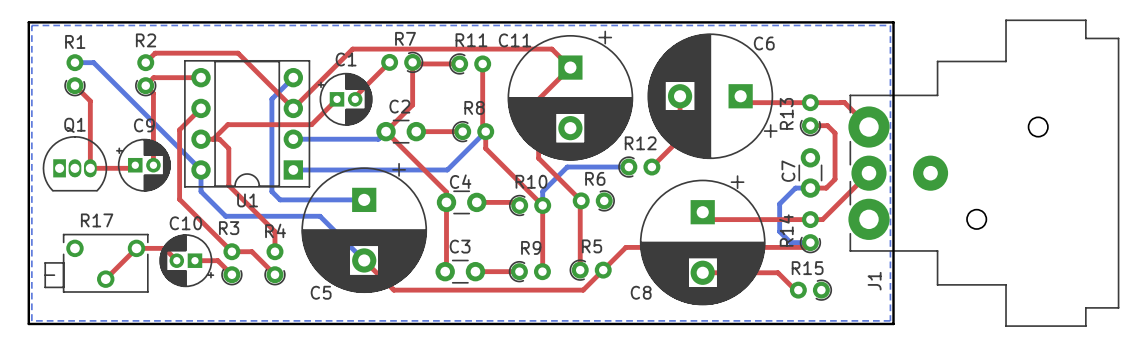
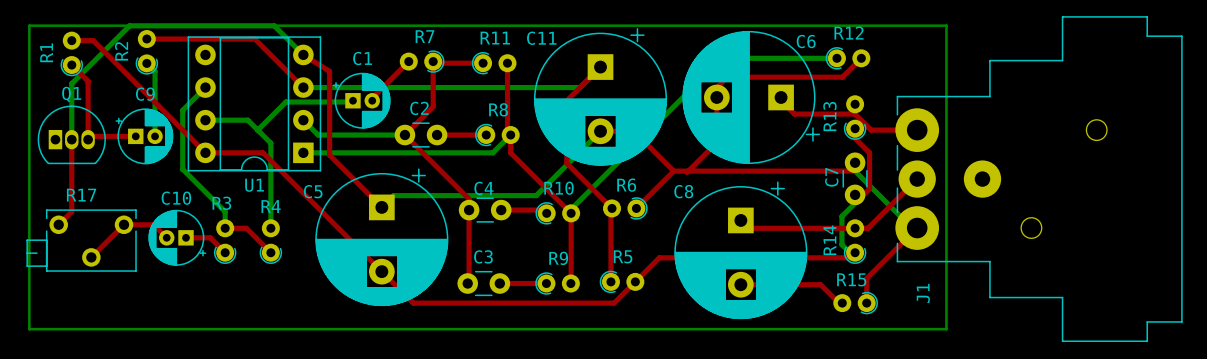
board edge: (28, 22) (893, 22) (893, 323) (28, 323) (28, 22) -> none
bottom zone outline: (31, 25) (31, 320) (890, 320) (890, 25) (31, 25) -> none
bottom track: none -> (29, 25) (946, 25) (946, 329) (29, 329) (29, 25)
R2 name rotation: 0° (146, 40) -> 90° counterclockwise (121, 51)
R1 name rotation: 0° (75, 41) -> 90° counterclockwise (46, 52)
top track: none -> (146, 39) (254, 38) (303, 87)
top track: none -> (71, 41) (93, 40) (205, 152) (263, 152) (381, 271)
top track: none -> (303, 54) (329, 71) (329, 155) (381, 207)
bottom track: none -> (303, 54) (274, 25) (129, 25) (71, 83) (71, 139)
top track: none -> (861, 58) (842, 77) (727, 77) (710, 94)
bottom track: (74, 62) (93, 62) (201, 169) (201, 191) (225, 216) (320, 216) (364, 260) -> none
top track: (145, 62) (155, 53) (238, 53) (293, 108) (352, 49) (551, 49) (570, 67) -> none
bottom track: none -> (146, 63) (155, 71) (155, 136)
top track: none -> (71, 65) (88, 81) (88, 139) (91, 136) (135, 136)
bottom track: none -> (600, 67) (580, 87) (303, 87)
R1 position: (74, 75) -> (71, 53)
R2 position: (145, 75) -> (146, 52)
top track: (201, 77) (153, 77) (145, 85) (153, 93) (153, 165) -> none
bottom track: (293, 77) (271, 99) (271, 191) (280, 199) (364, 199) -> none
top track: (74, 85) (90, 101) (90, 168) (132, 168) (135, 165) -> none
bottom track: none -> (205, 87) (182, 110) (182, 169) (225, 211) (225, 228)
top track: (740, 96) (747, 102) (844, 102) (868, 127) -> (774, 94) (794, 114) (855, 114) (871, 130) (917, 130)
top track: (337, 99) (311, 124) (227, 124) (213, 139) -> none
bottom track: none -> (352, 100) (285, 102) (257, 130)
top track: (201, 108) (179, 129) (179, 199) (231, 251) (251, 251) (274, 274) -> none
bottom track: none -> (205, 120) (247, 120) (270, 143) (270, 228)
U1 position: (247, 123) -> (254, 103)
top track: (810, 125) (827, 125) (835, 133) (835, 179) (826, 188) (810, 188) -> none
top track: none -> (600, 131) (633, 131) (673, 171)
bottom track: none -> (600, 131) (536, 195) (393, 195) (384, 204)
bottom track: (386, 131) (378, 139) (293, 139) -> (404, 135) (318, 135) (303, 120)
top track: none -> (855, 138) (869, 152) (869, 188) (855, 203)
top track: none -> (71, 139) (71, 211) (58, 224)
top track: (201, 139) (219, 139) (228, 148) (228, 185) (274, 231) (274, 251) -> none
bottom track: (468, 148) (447, 169) (293, 169) -> (492, 152) (303, 152)
Q1 position: (74, 163) -> (71, 134)
C9 position: (143, 165) -> (144, 136)
top track: none -> (673, 171) (636, 208)
top track: none -> (673, 171) (855, 171)
bottom track: none -> (855, 171) (912, 228) (917, 228)
bottom track: (628, 167) (567, 167) (542, 191) (542, 201) -> (836, 58) (722, 58) (571, 209)
R12 position: (639, 167) -> (848, 58)
bottom track: (810, 188) (795, 188) (779, 203) (779, 231) (790, 242) (810, 242) -> none
bottom track: none -> (855, 203) (841, 216) (841, 244) (855, 257)
top track: none -> (225, 228) (246, 228) (270, 252)
top track: none -> (917, 228) (866, 278) (866, 306)
top track: (176, 260) (164, 248) (136, 248) (105, 279) -> (166, 237) (153, 224) (124, 224) (91, 257)
C10 position: (186, 260) -> (177, 237)
top track: (194, 260) (217, 260) (231, 274) -> (186, 237) (210, 237) (225, 252)
R17 position: (96, 263) -> (81, 240)
R3 position: (231, 264) -> (225, 241)
R4 position: (274, 264) -> (270, 241)
C5 name position: C5 (321, 292) -> C5 (313, 191)
C8 name position: C8 (641, 292) -> C8 (683, 191)

